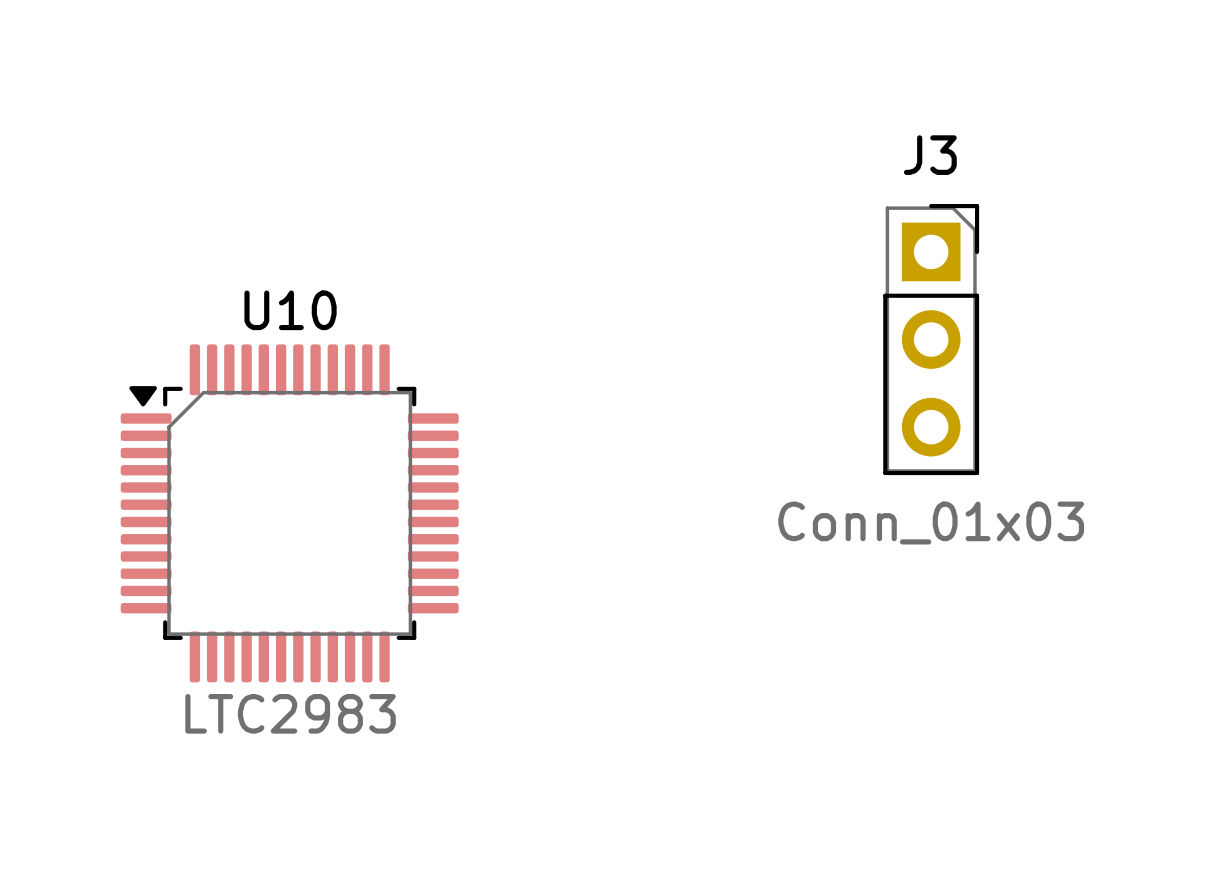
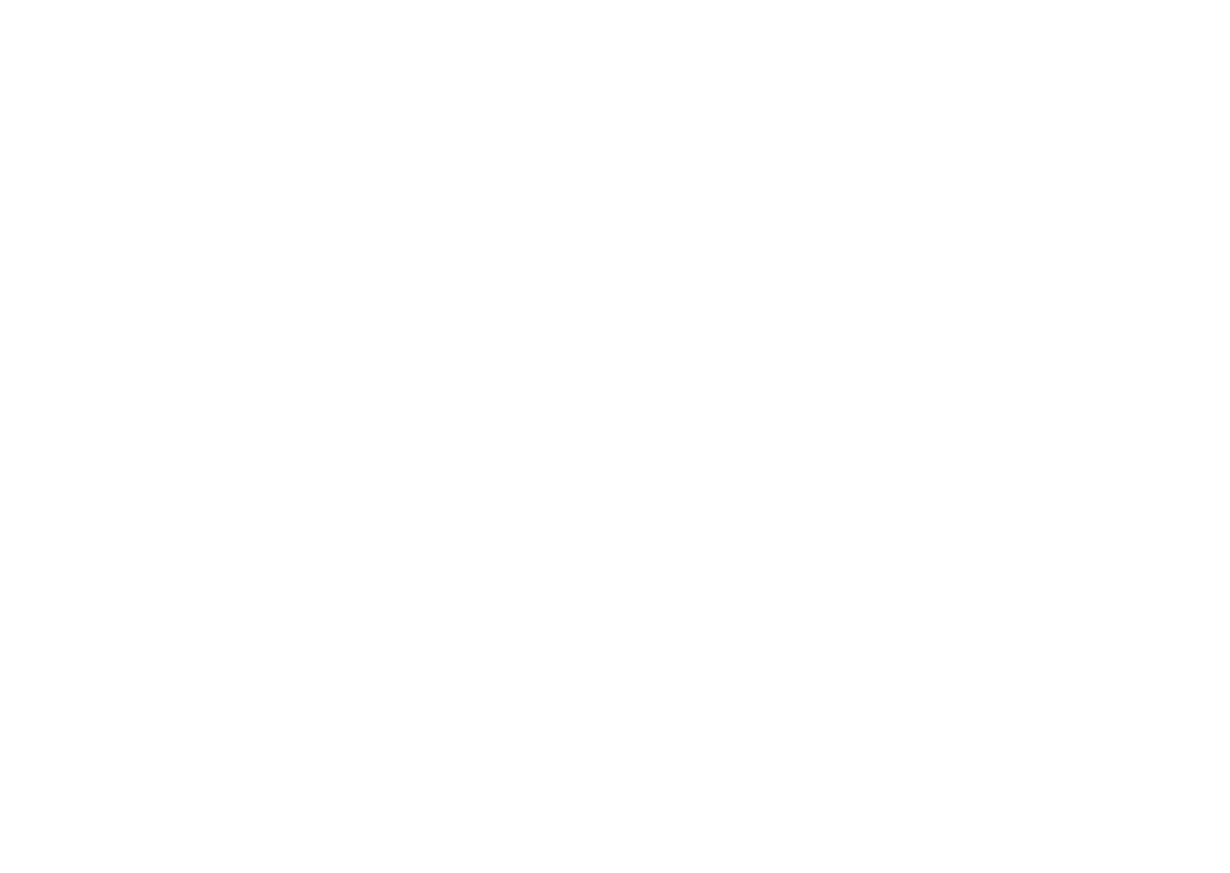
J3: Conn_01x03 (931, 339) -> none
U10: LTC2983 (289, 513) -> none

